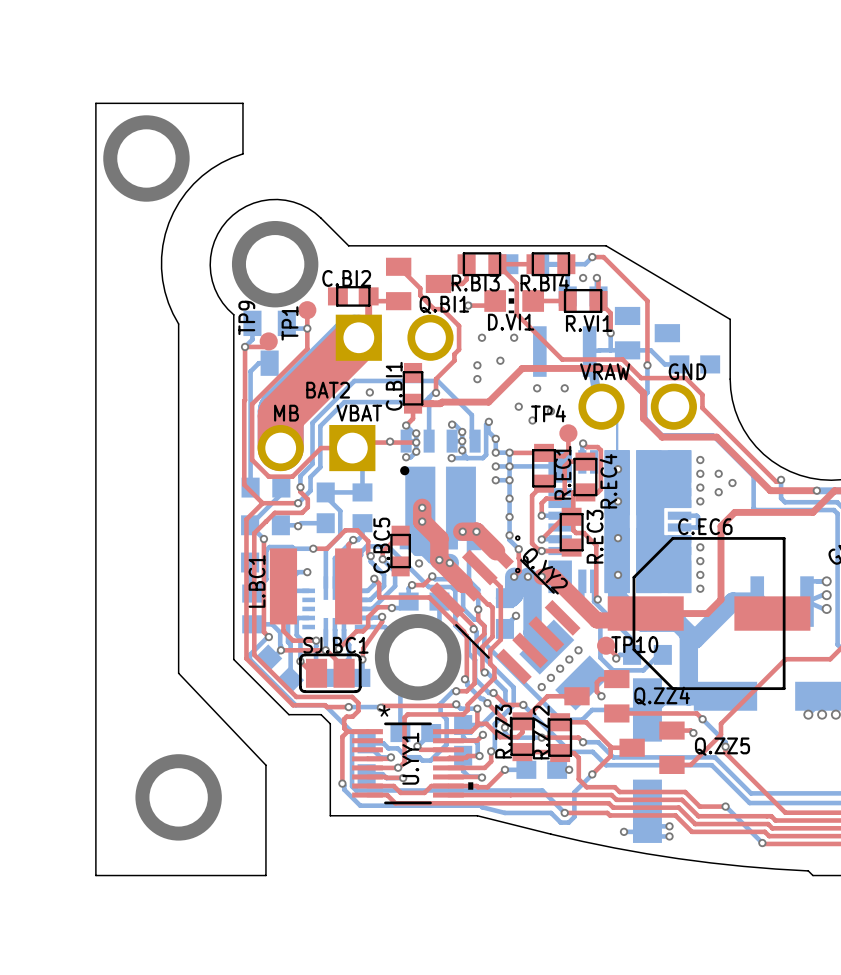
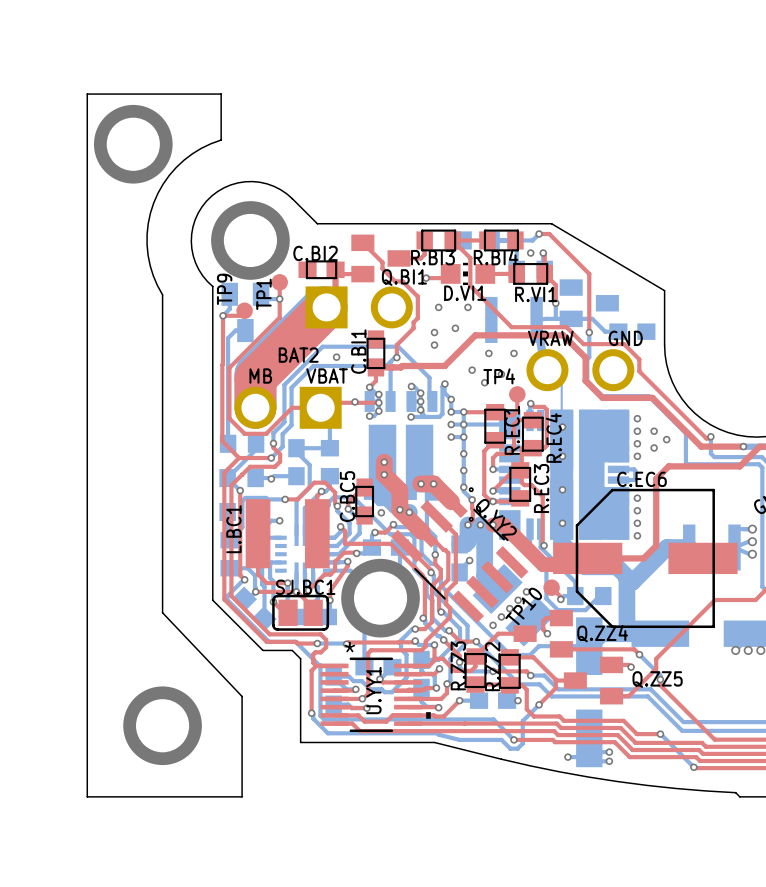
part footprint: [257, 424, 410, 476] -> [234, 386, 342, 429]
TP10 name rotation: 0° (634, 644) -> 50° counterclockwise (523, 606)
TP10 name position: TP10 (634, 644) -> TP10 (523, 606)

